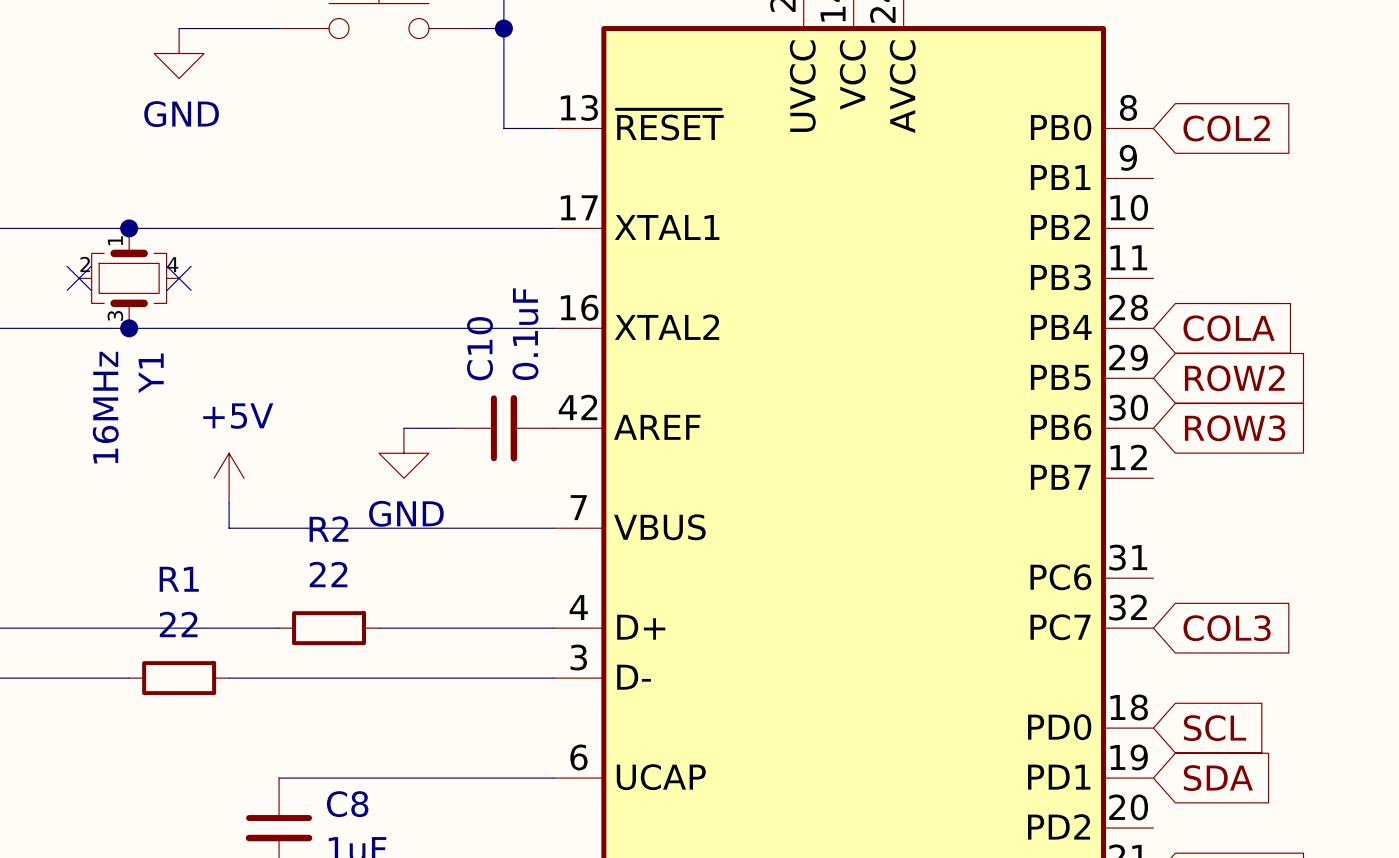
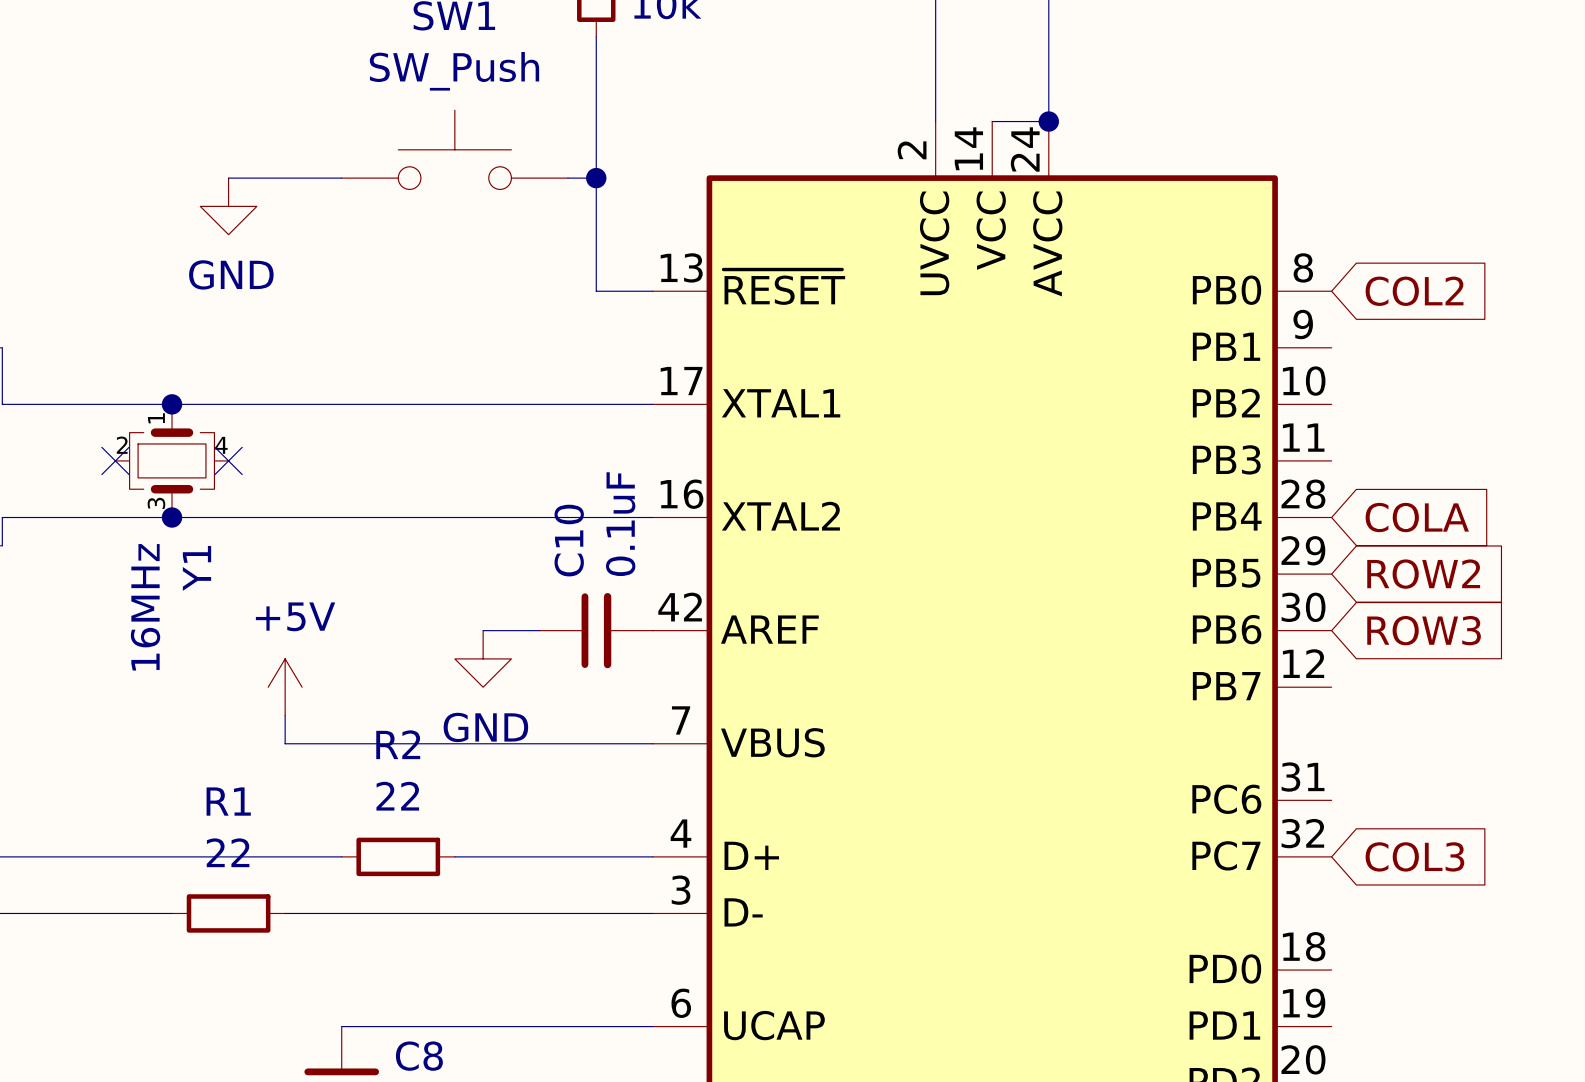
global label: SCL (1215, 728) -> none
global label: SDA (1218, 778) -> none

